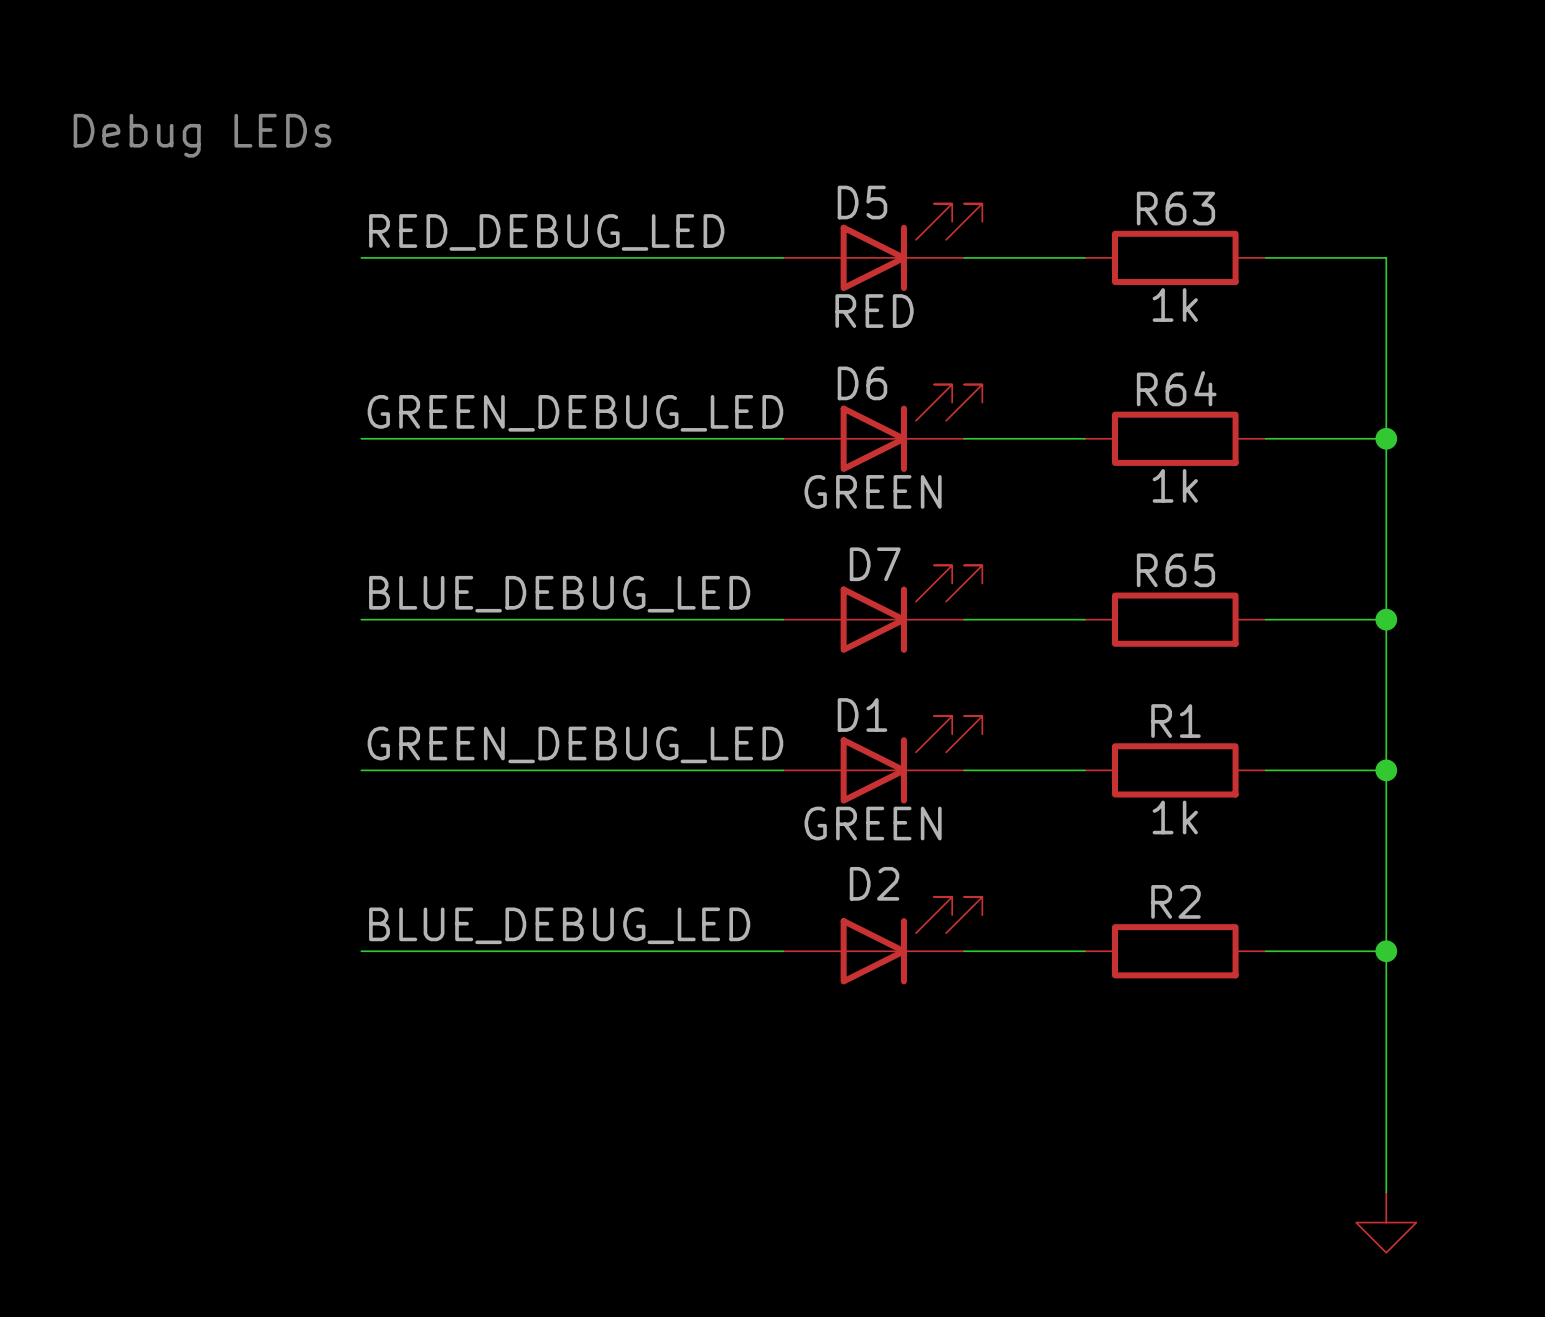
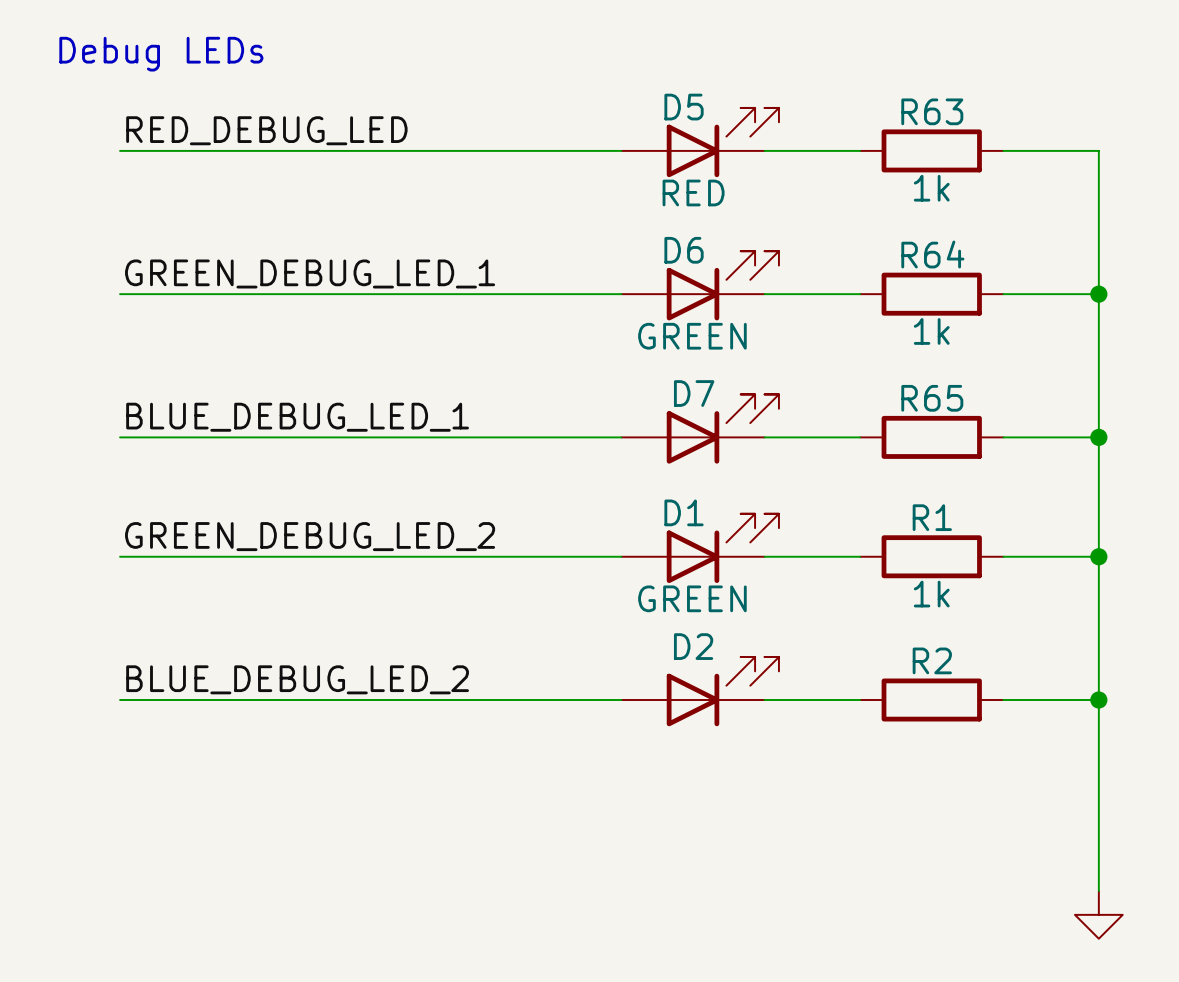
label position: RED_DEBUG_LED (546, 232) -> RED_DEBUG_LED (266, 130)
wire: none -> (120, 150) (287, 150)
label: GREEN_DEBUG_LED (575, 413) -> GREEN_DEBUG_LED_1 (310, 273)
wire: none -> (120, 294) (287, 294)
label: BLUE_DEBUG_LED (559, 594) -> BLUE_DEBUG_LED_1 (297, 417)
wire: none -> (120, 437) (287, 437)
label: GREEN_DEBUG_LED (575, 744) -> GREEN_DEBUG_LED_2 (310, 536)
wire: none -> (120, 556) (287, 556)
label: BLUE_DEBUG_LED (559, 925) -> BLUE_DEBUG_LED_2 (297, 679)
wire: none -> (120, 700) (287, 700)

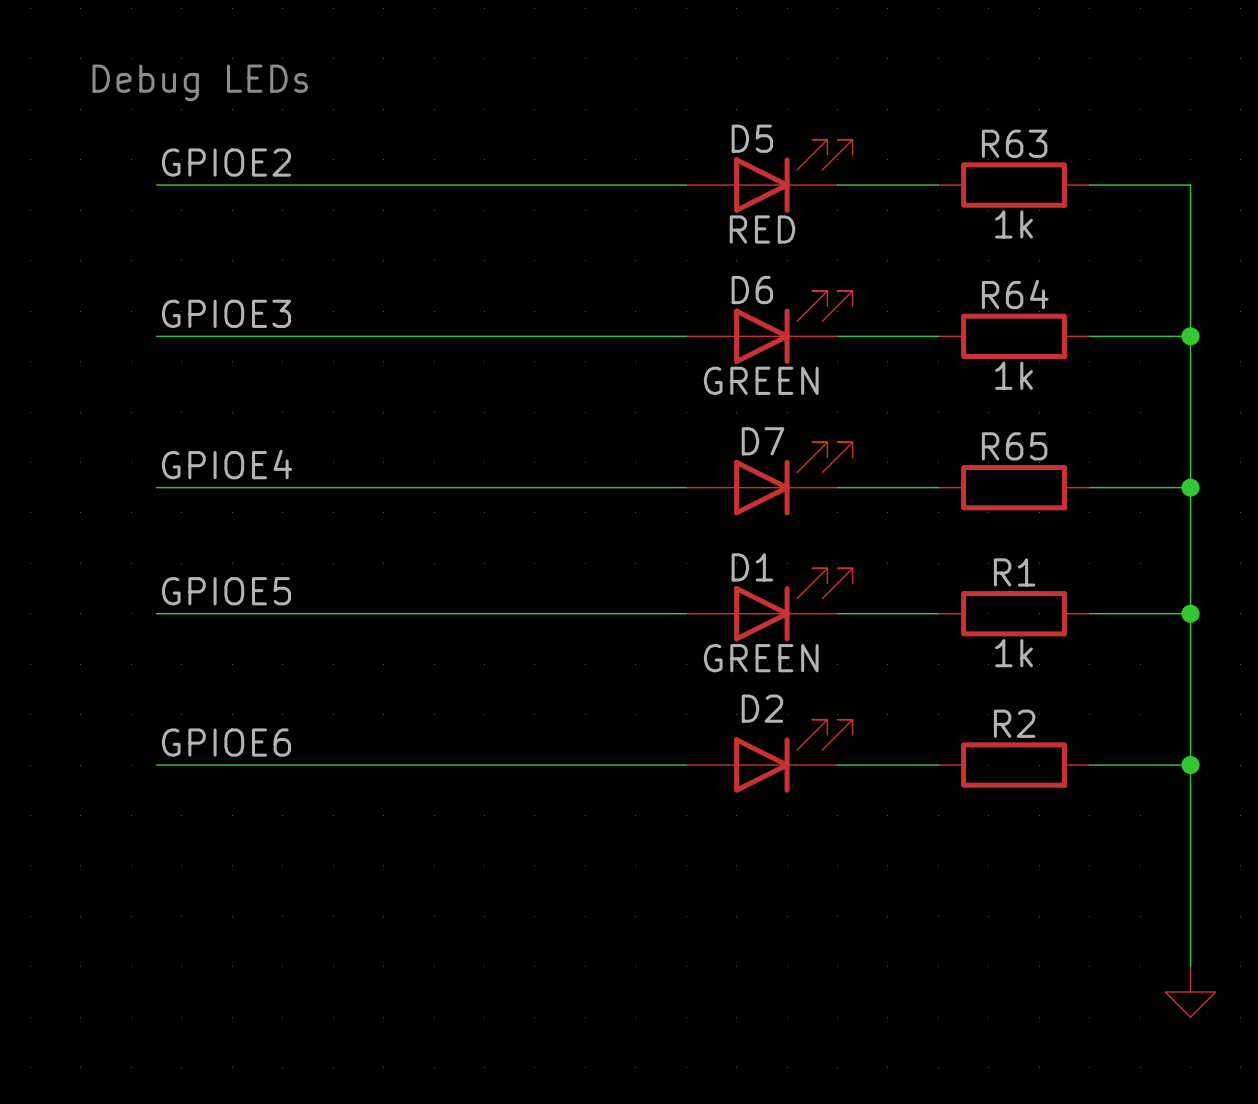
label: RED_DEBUG_LED (266, 130) -> GPIOE2 (226, 162)
label: GREEN_DEBUG_LED_1 (310, 273) -> GPIOE3 (226, 313)
label: BLUE_DEBUG_LED_1 (297, 417) -> GPIOE4 (227, 464)
label: GREEN_DEBUG_LED_2 (310, 536) -> GPIOE5 (226, 591)
label: BLUE_DEBUG_LED_2 (297, 679) -> GPIOE6 (226, 742)

